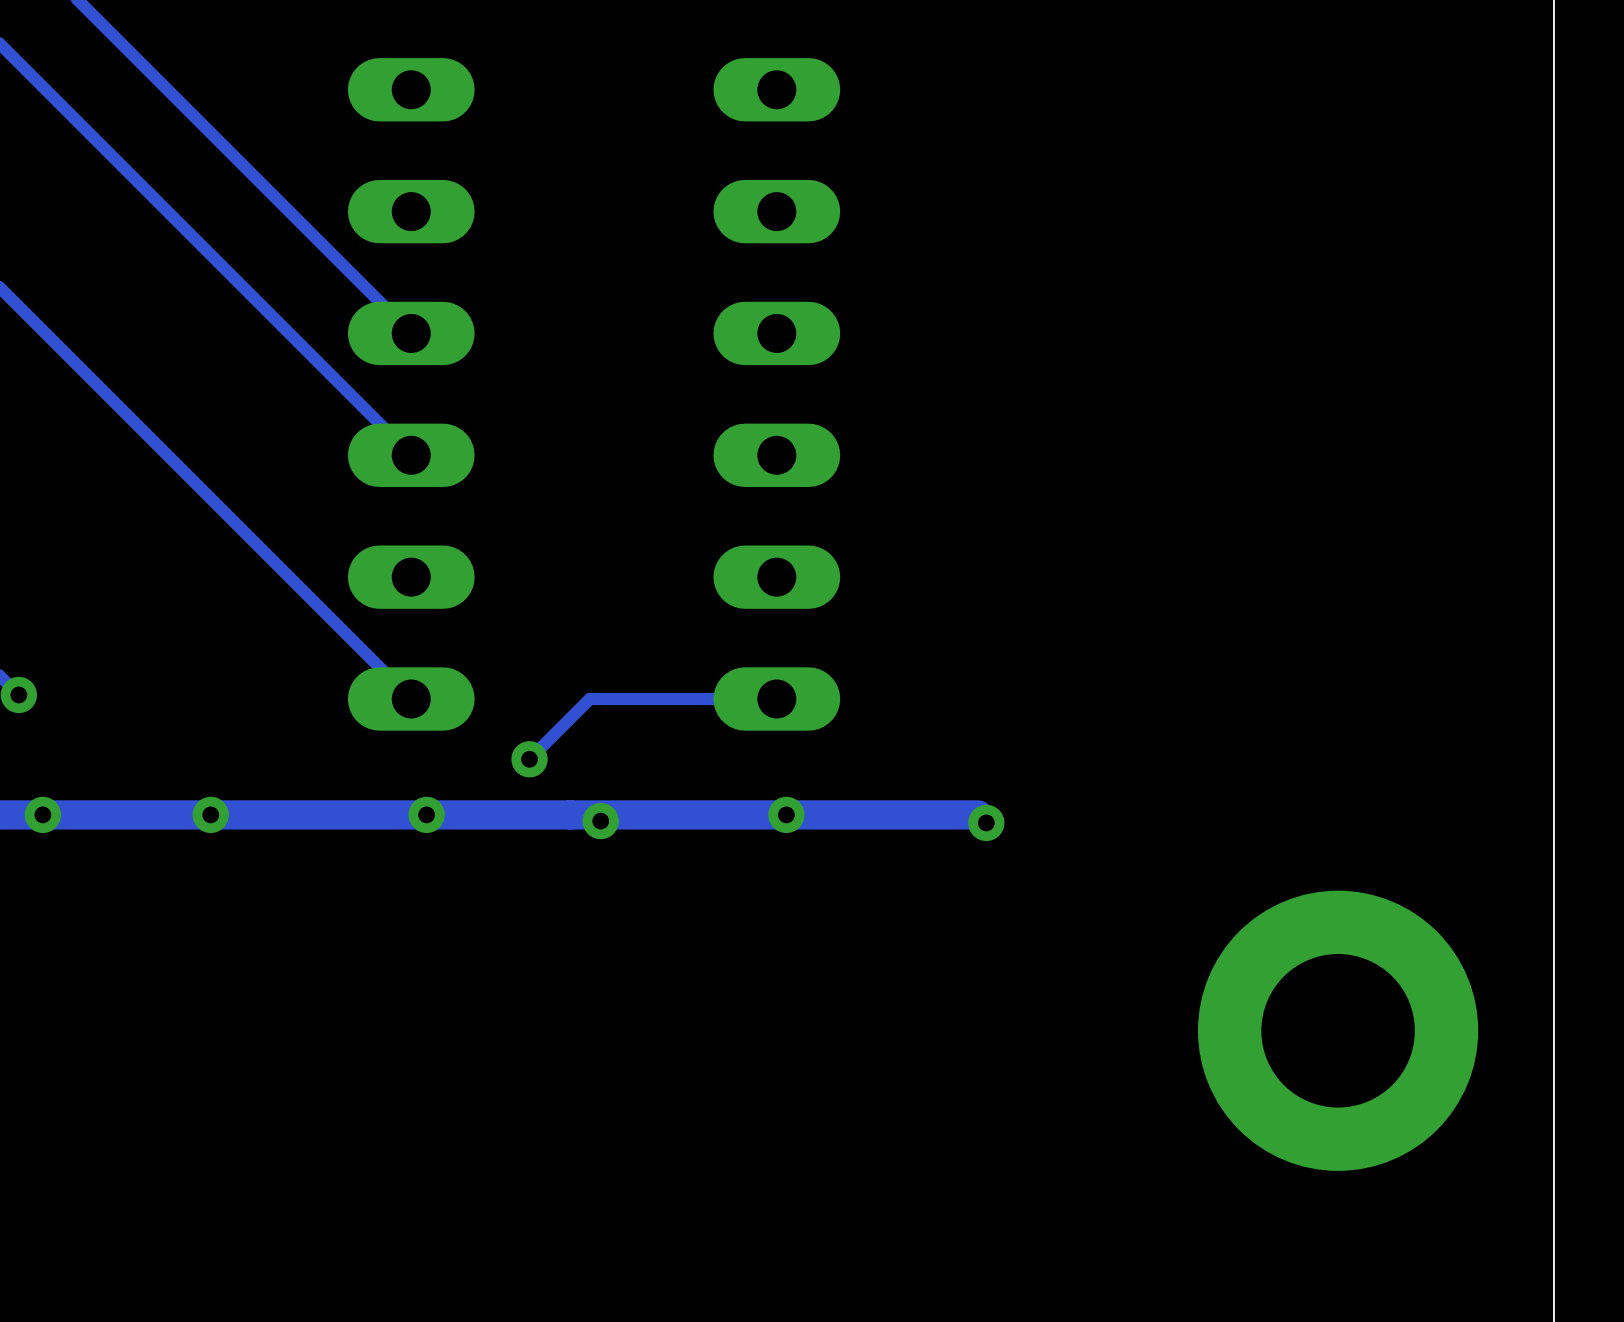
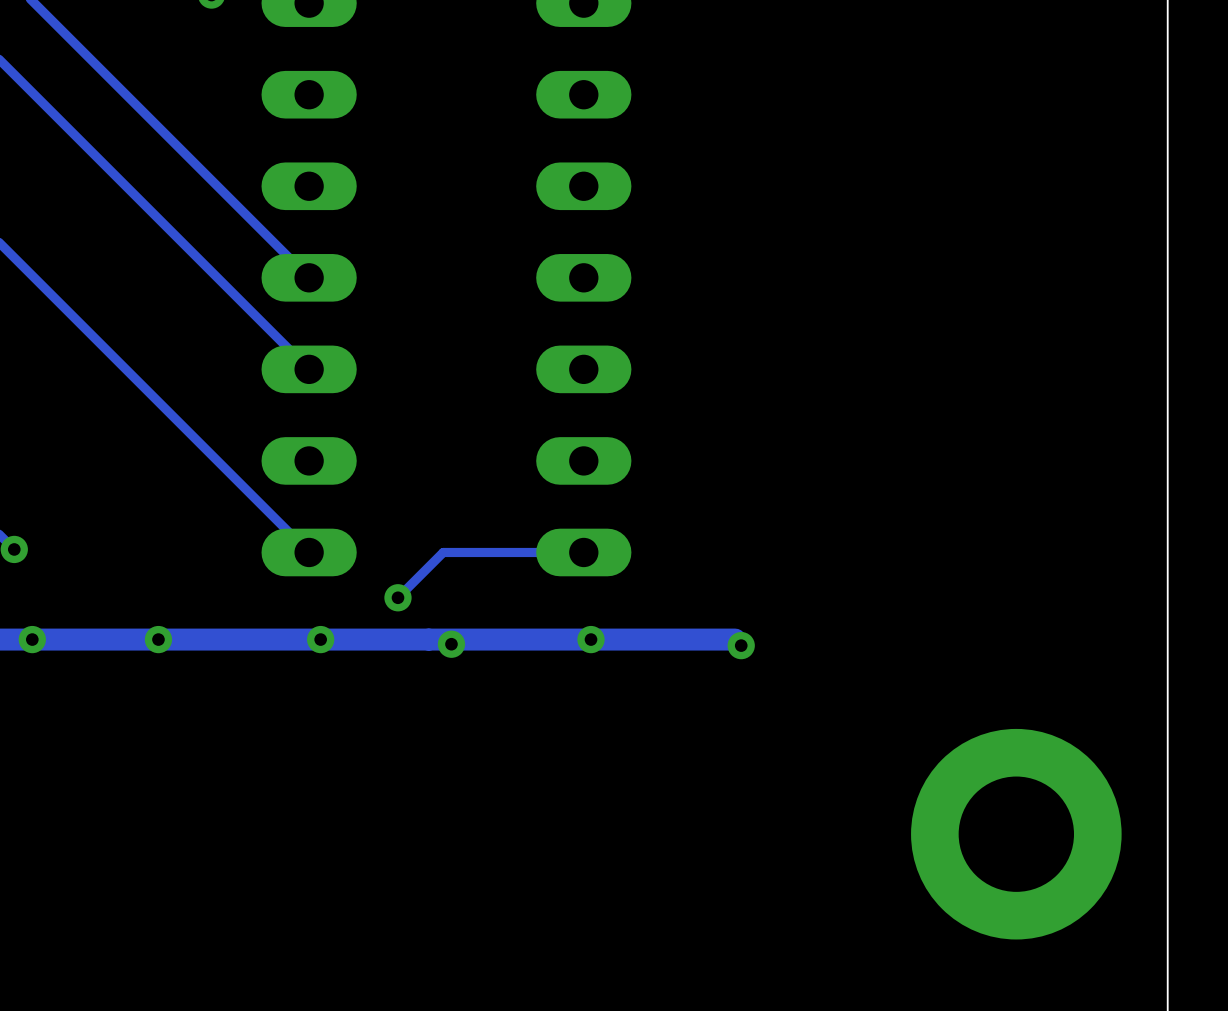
part position: (1338, 1030) -> (1016, 834)

